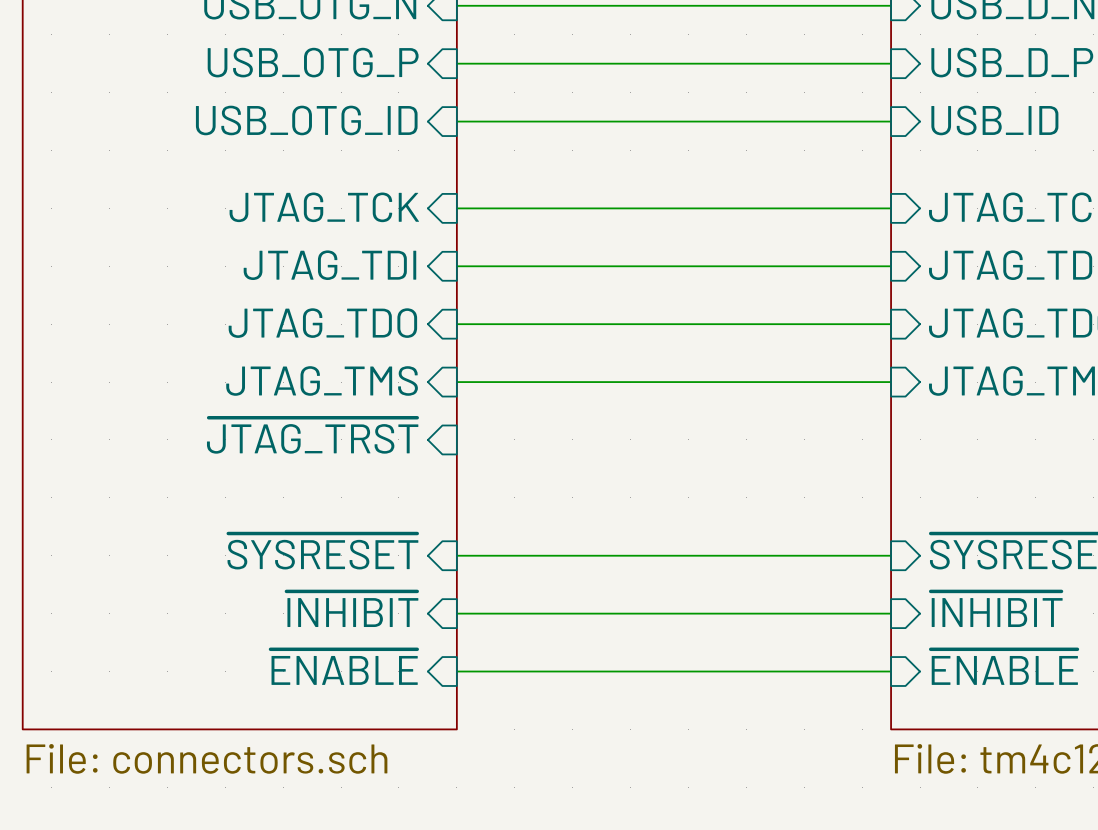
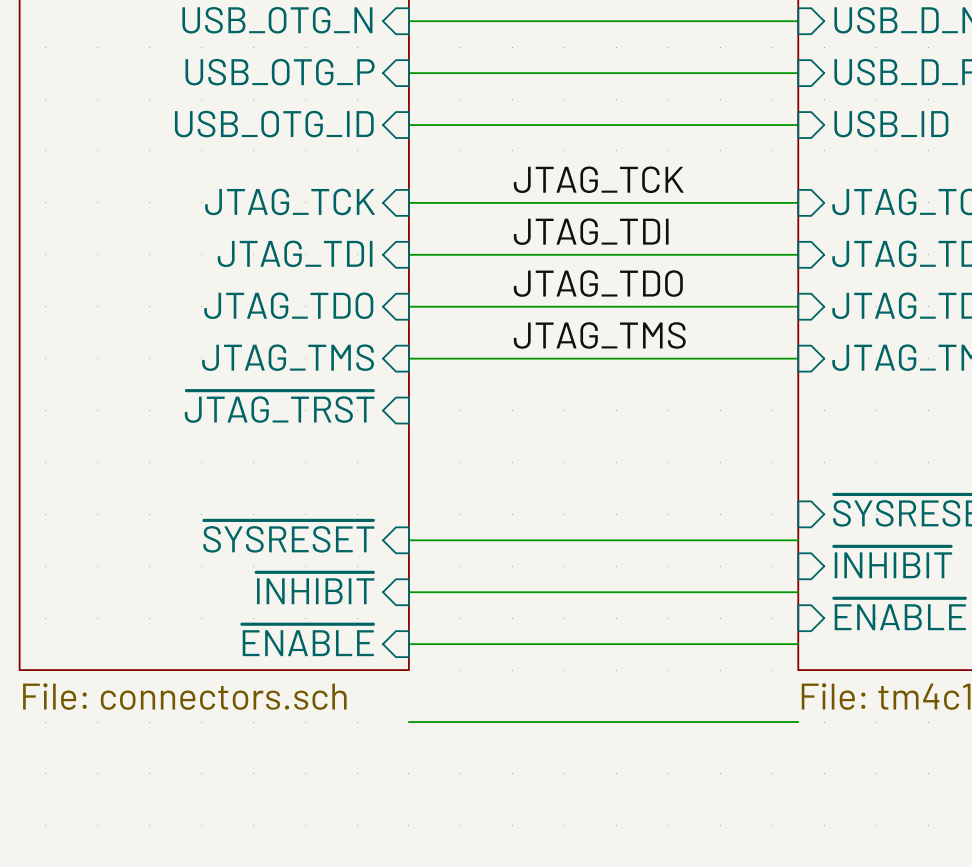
label: none -> JTAG_TCK (598, 179)
label: none -> JTAG_TDI (591, 231)
label: none -> JTAG_TDO (598, 283)
label: none -> JTAG_TMS (599, 335)
sheet pin position: ~{SYSRESET} (322, 551) -> ~{SYSRESET} (288, 536)
wire: (456, 555) (891, 555) -> (408, 540) (798, 540)
sheet pin position: ~{INHIBIT} (352, 609) -> ~{INHIBIT} (315, 588)
wire: (456, 613) (891, 613) -> (408, 592) (798, 592)
sheet pin position: ~{ENABLE} (344, 667) -> ~{ENABLE} (307, 640)
wire: (456, 671) (891, 671) -> (408, 644) (798, 644)
wire: none -> (408, 722) (798, 722)

